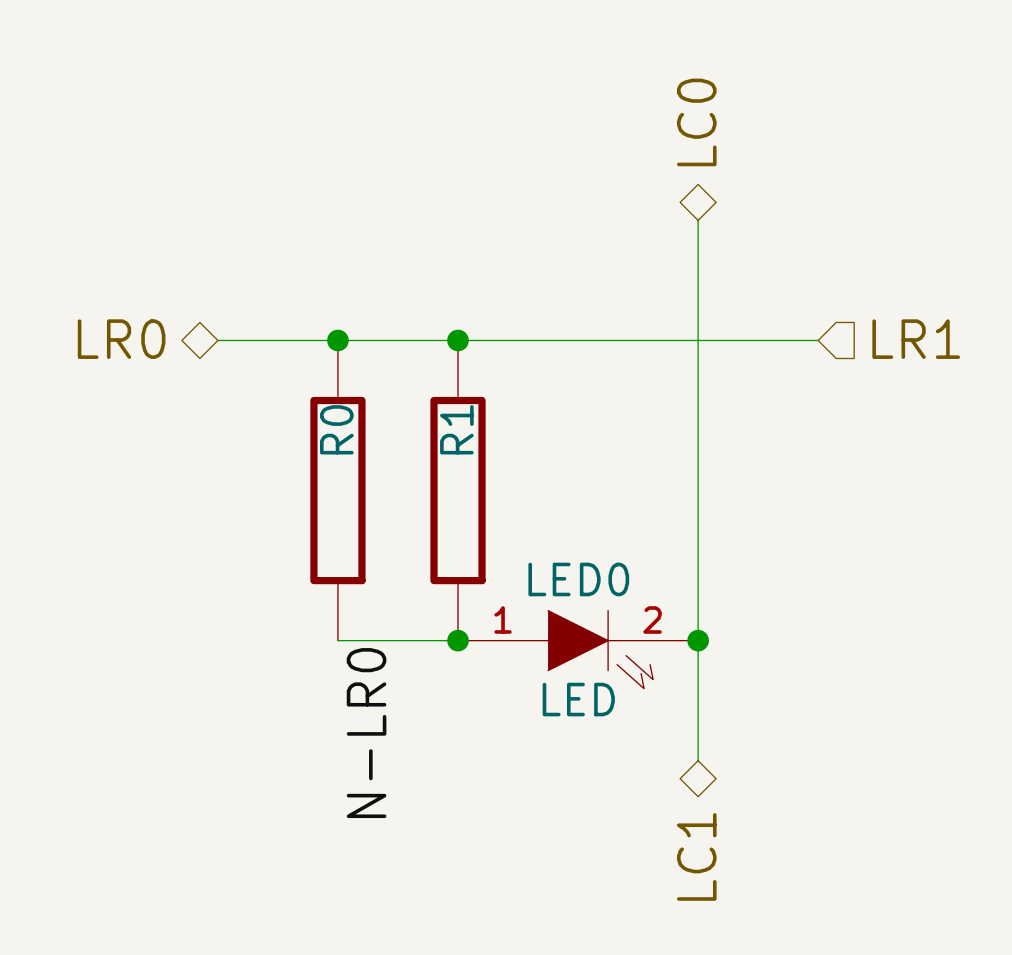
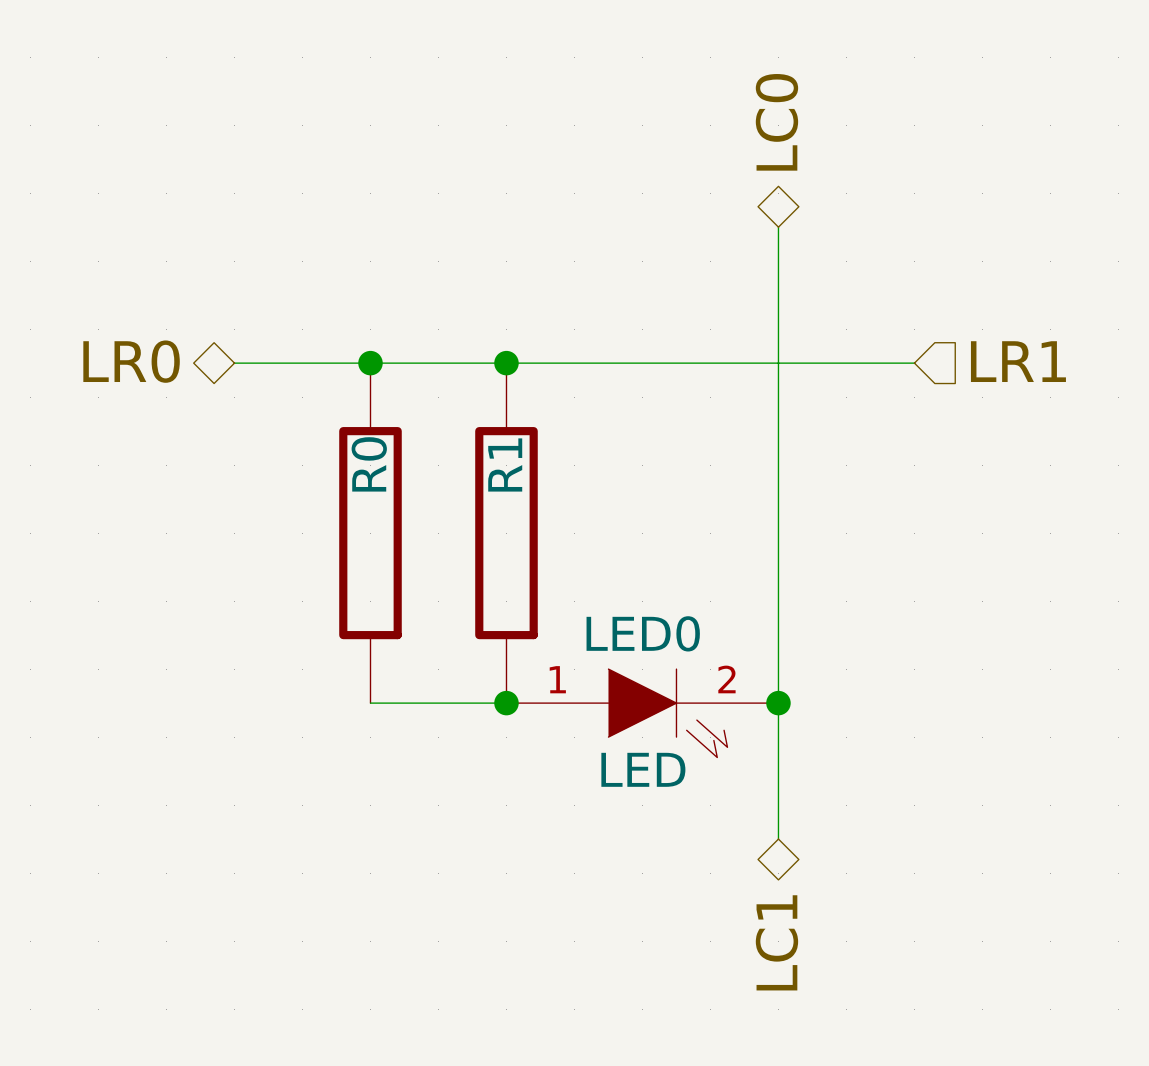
label: N-LR0 (366, 733) -> none

